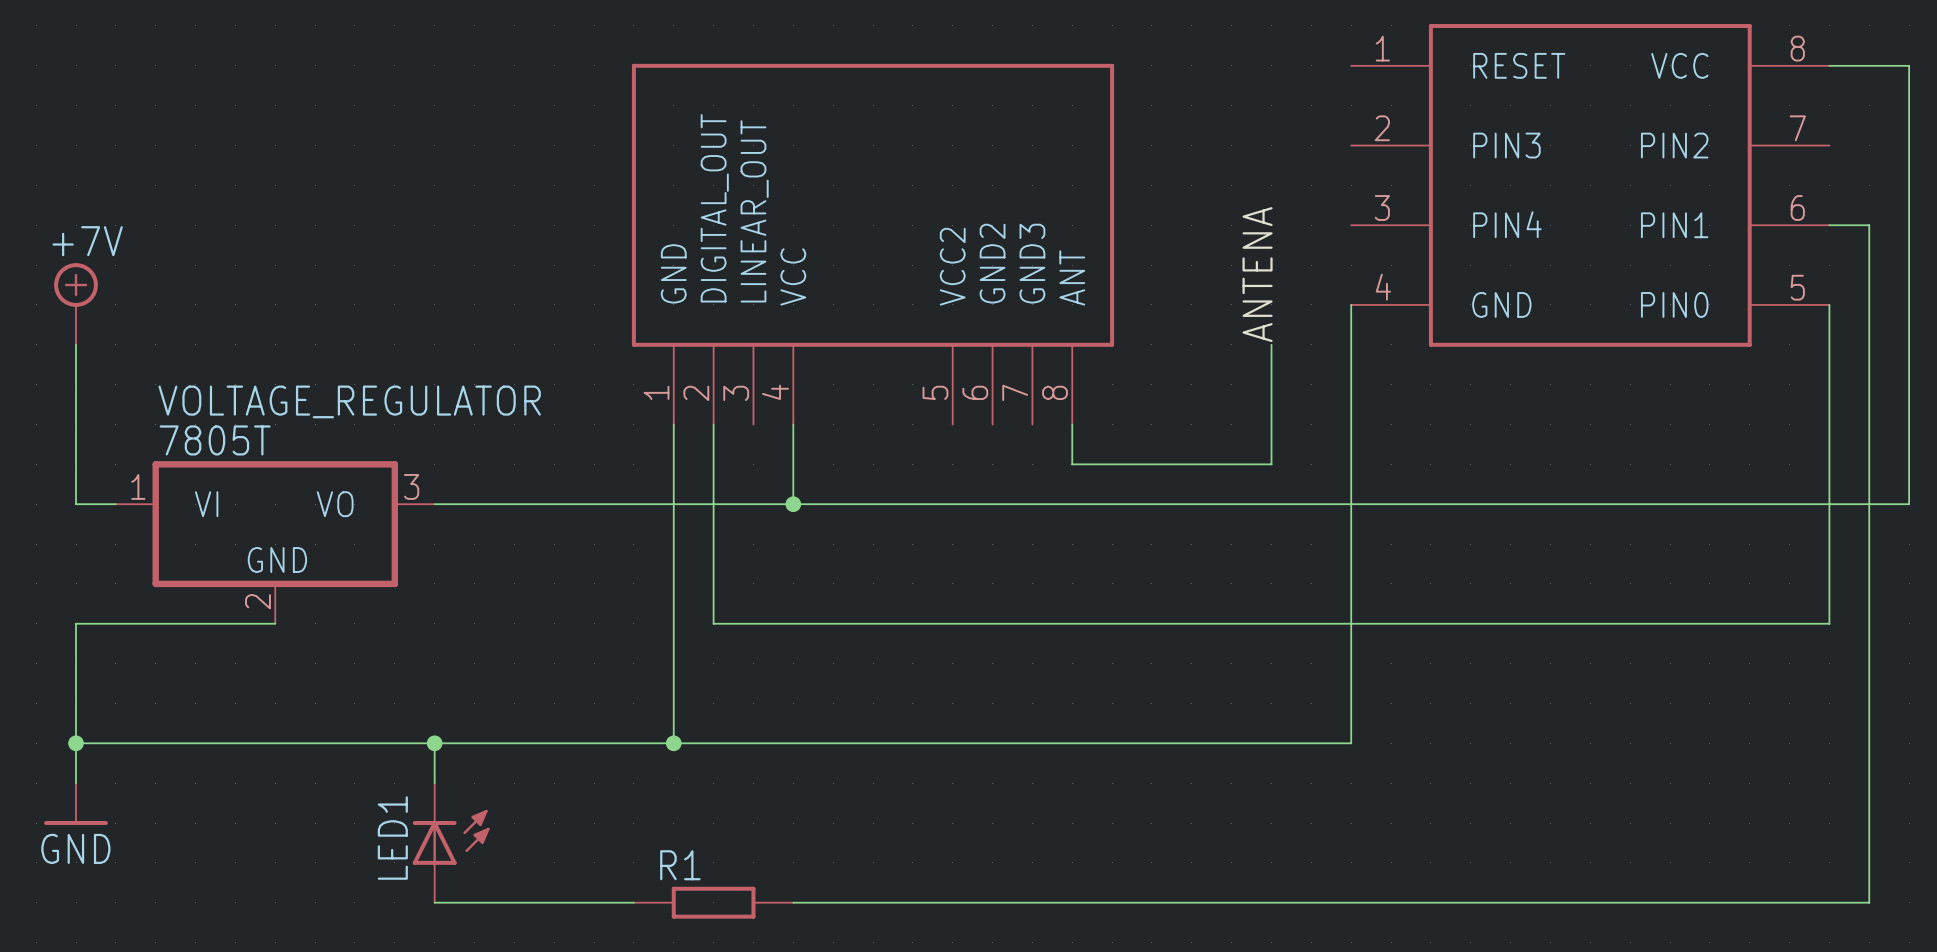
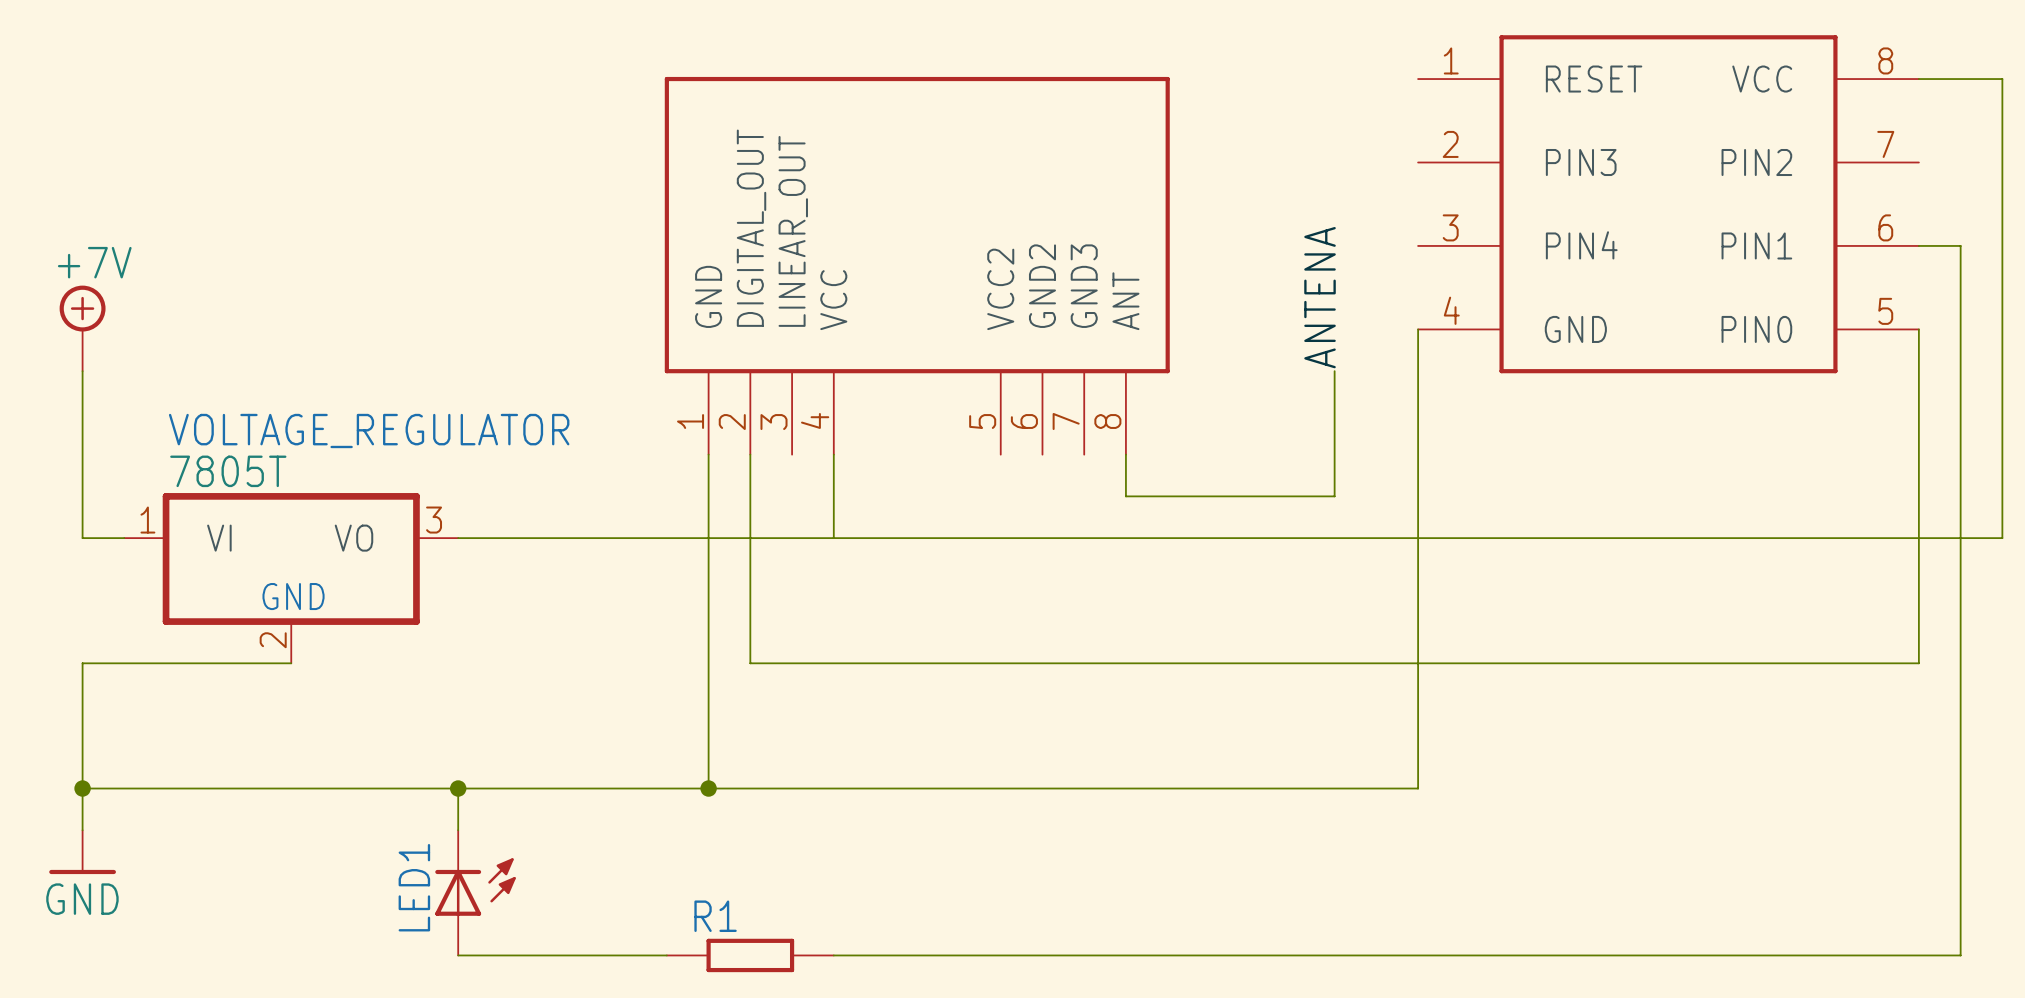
junction: (793, 504) -> none

